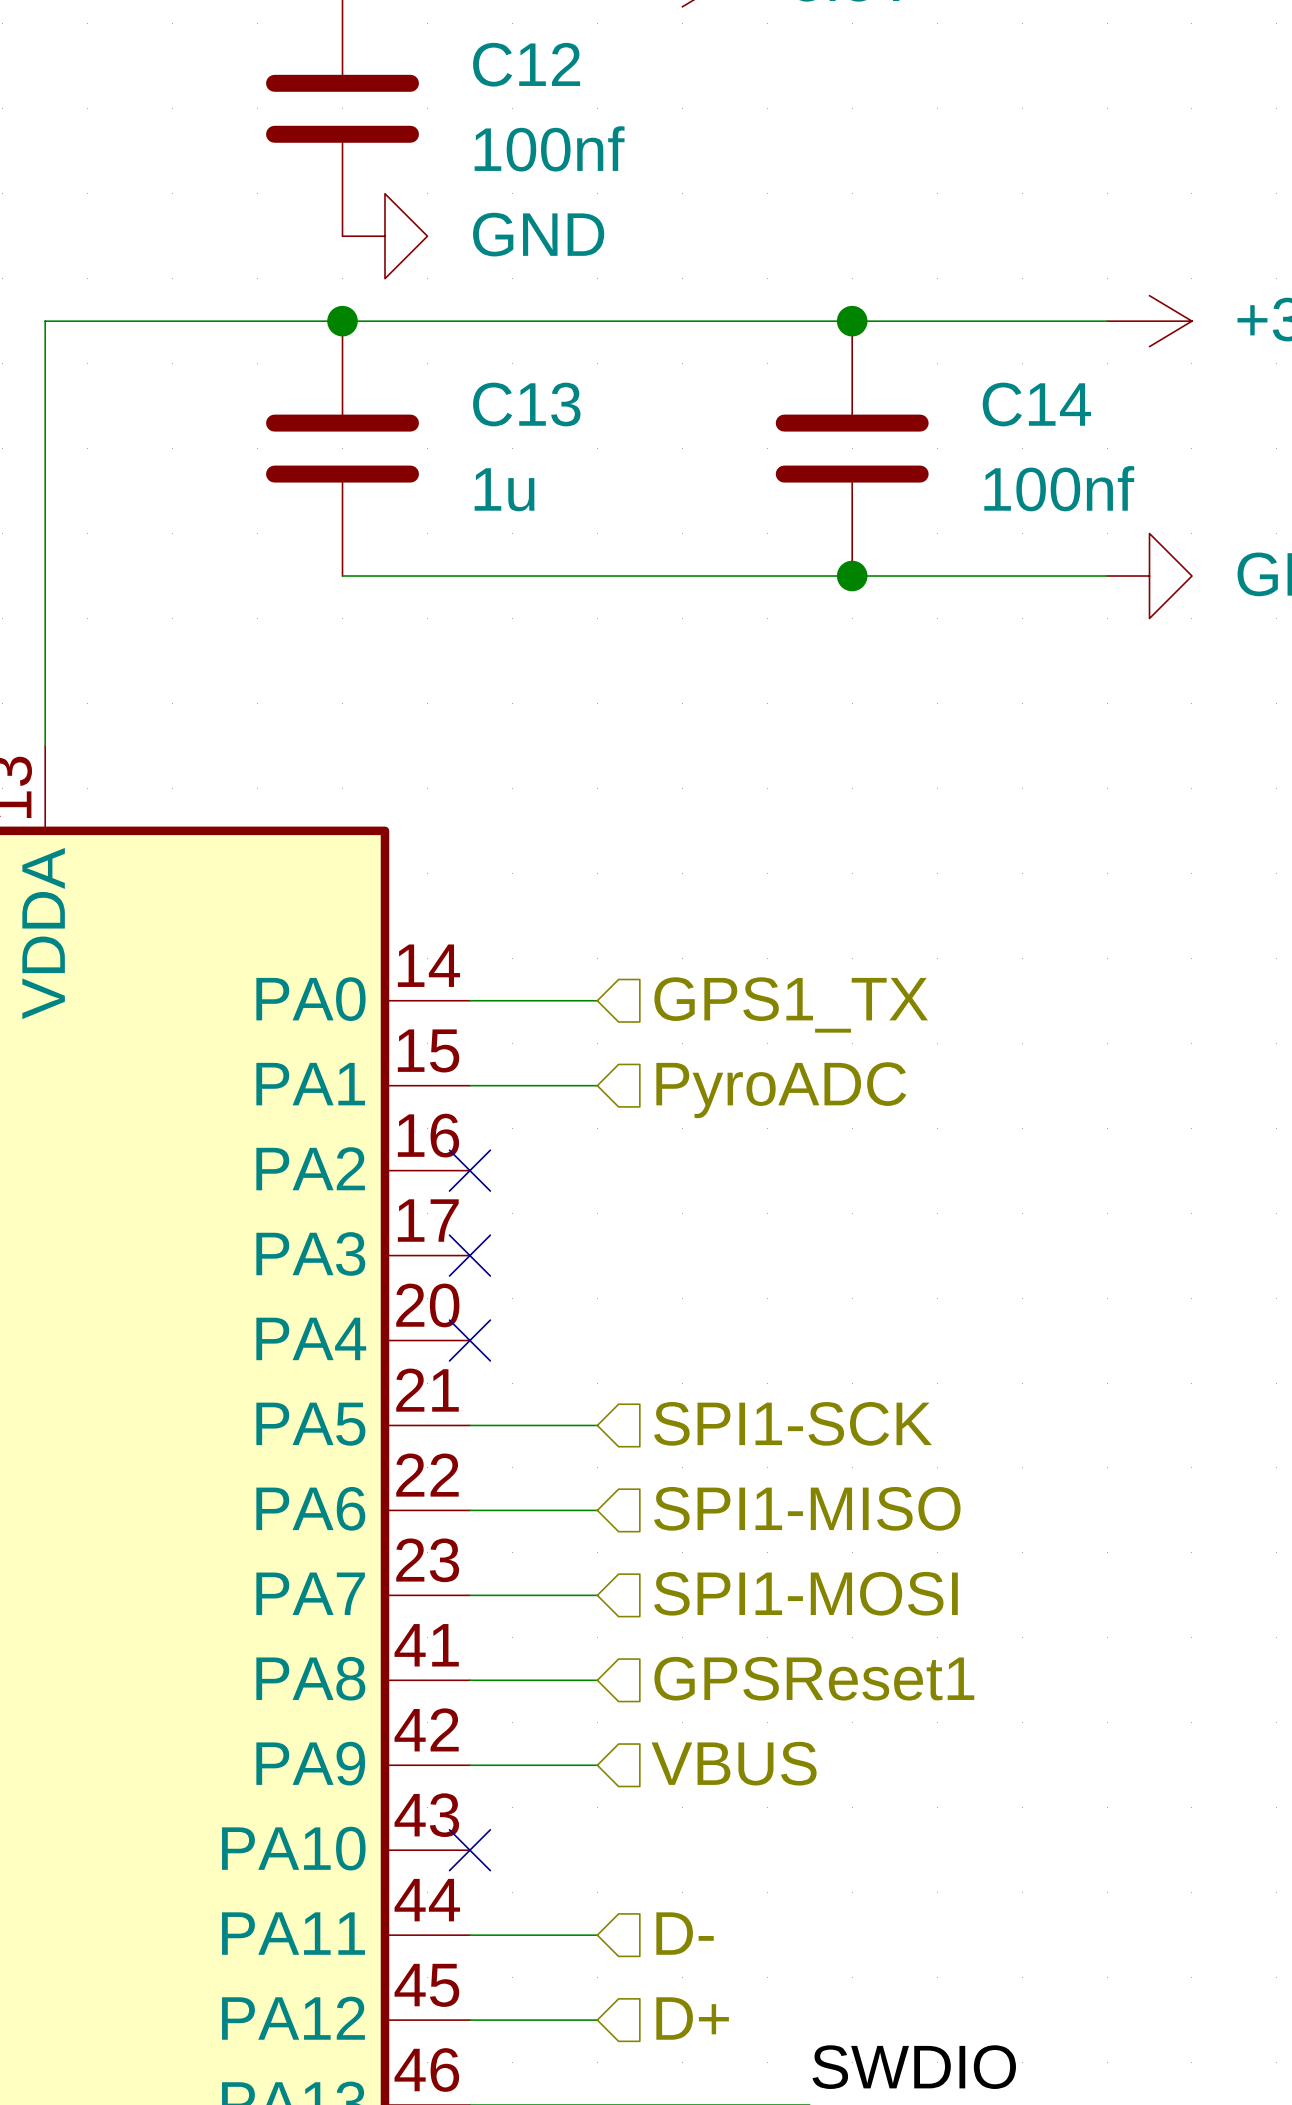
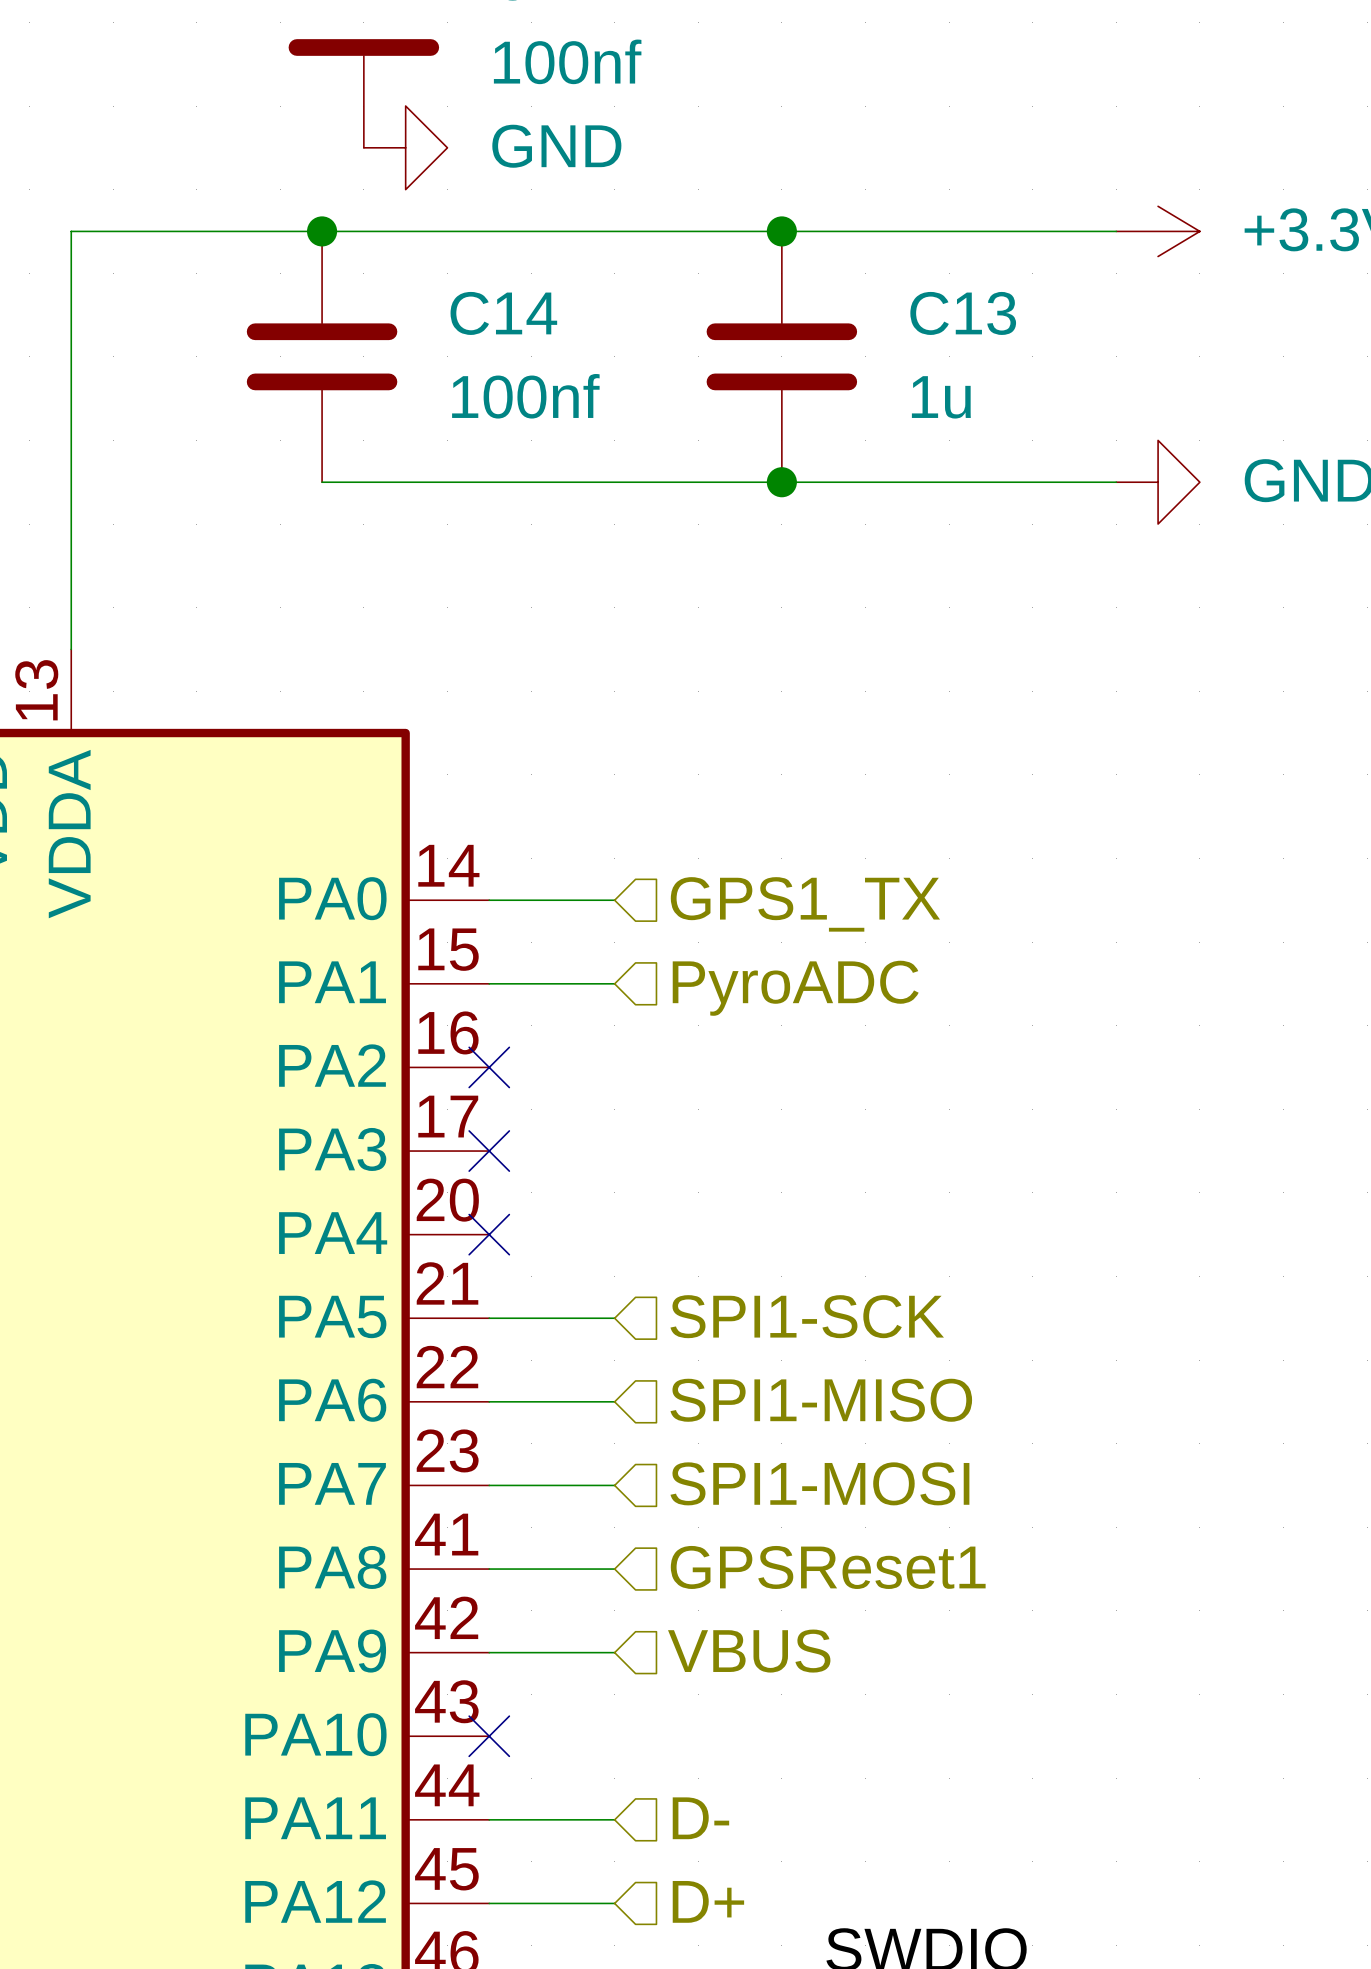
junction position: (342, 321) -> (322, 231)
junction position: (852, 321) -> (781, 231)
C13 position: (342, 448) -> (781, 356)
C14 position: (852, 448) -> (322, 356)
wire: none -> (322, 482) (363, 482)
junction position: (852, 576) -> (781, 482)

